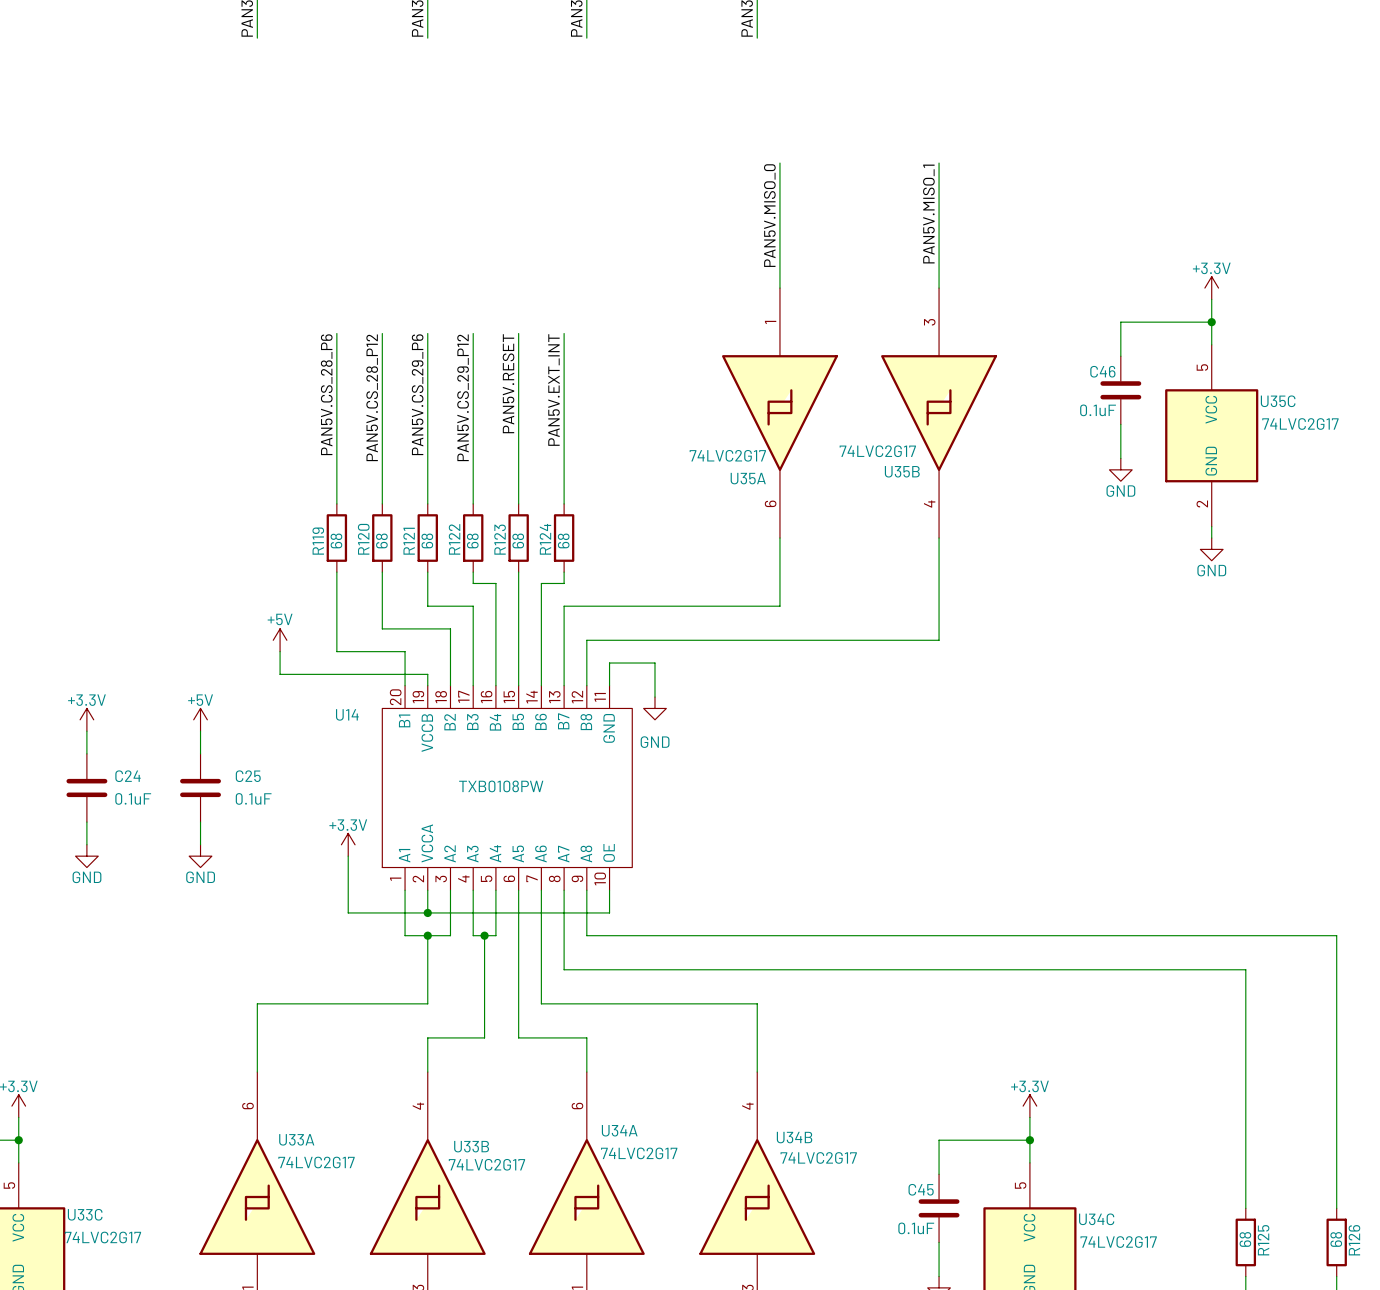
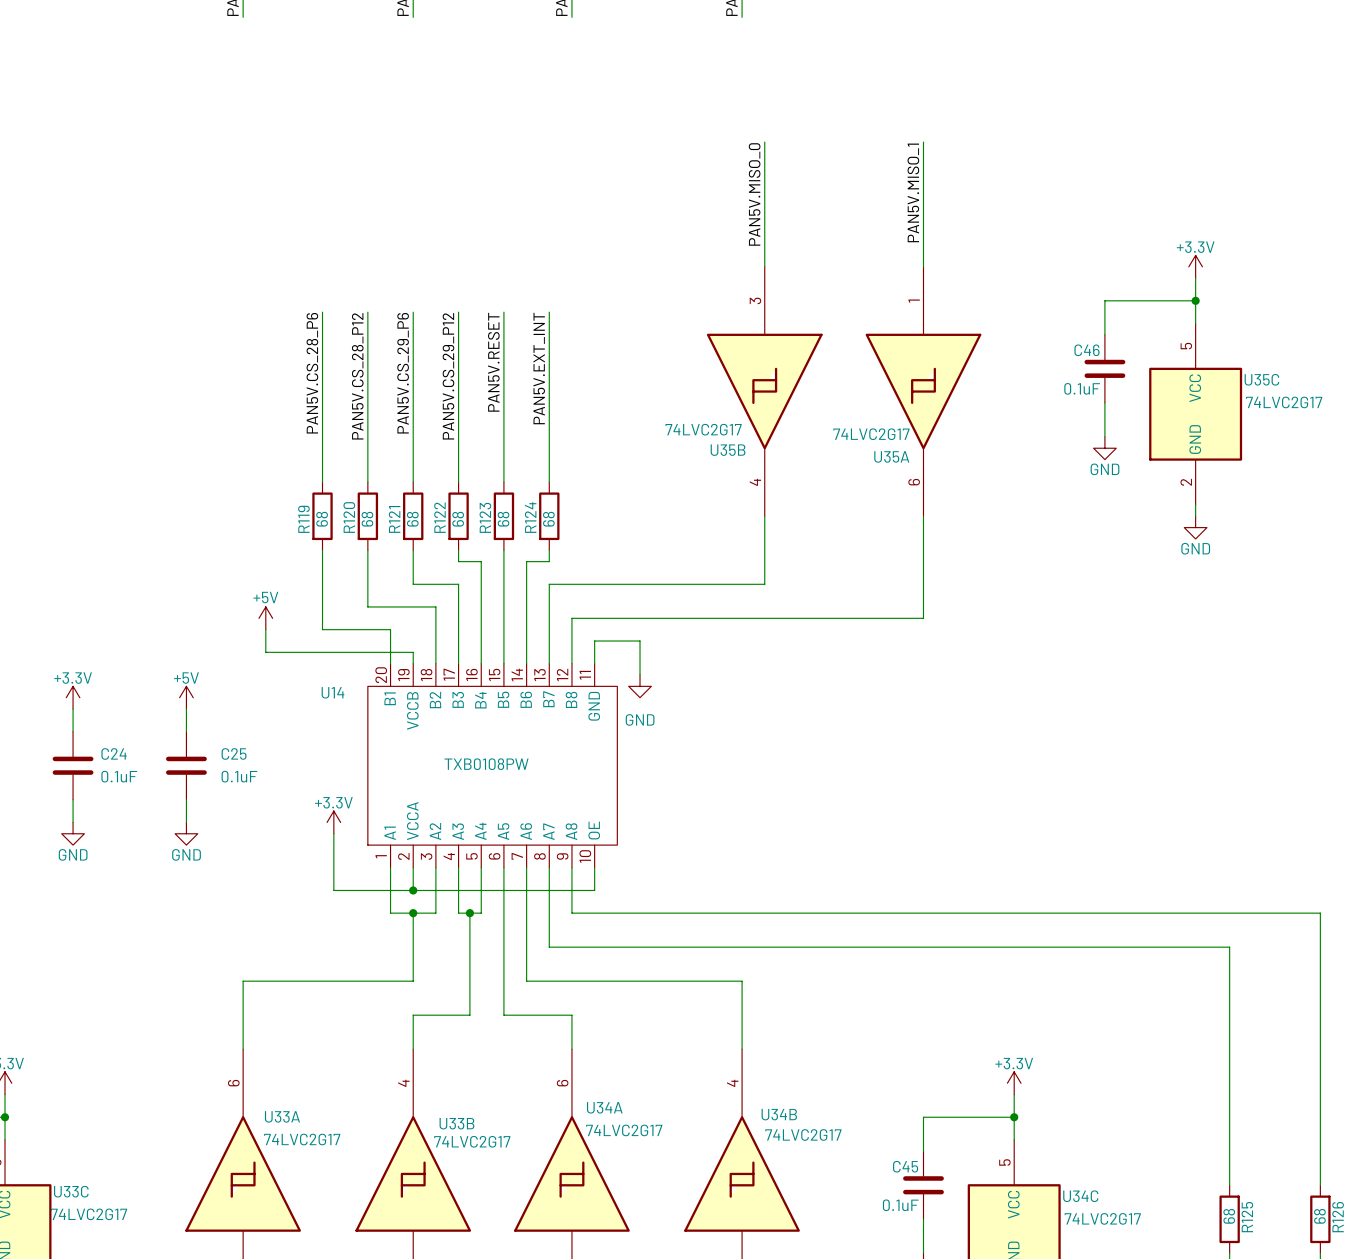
U35A position: (779, 413) -> (923, 391)
U35B position: (939, 413) -> (764, 391)

